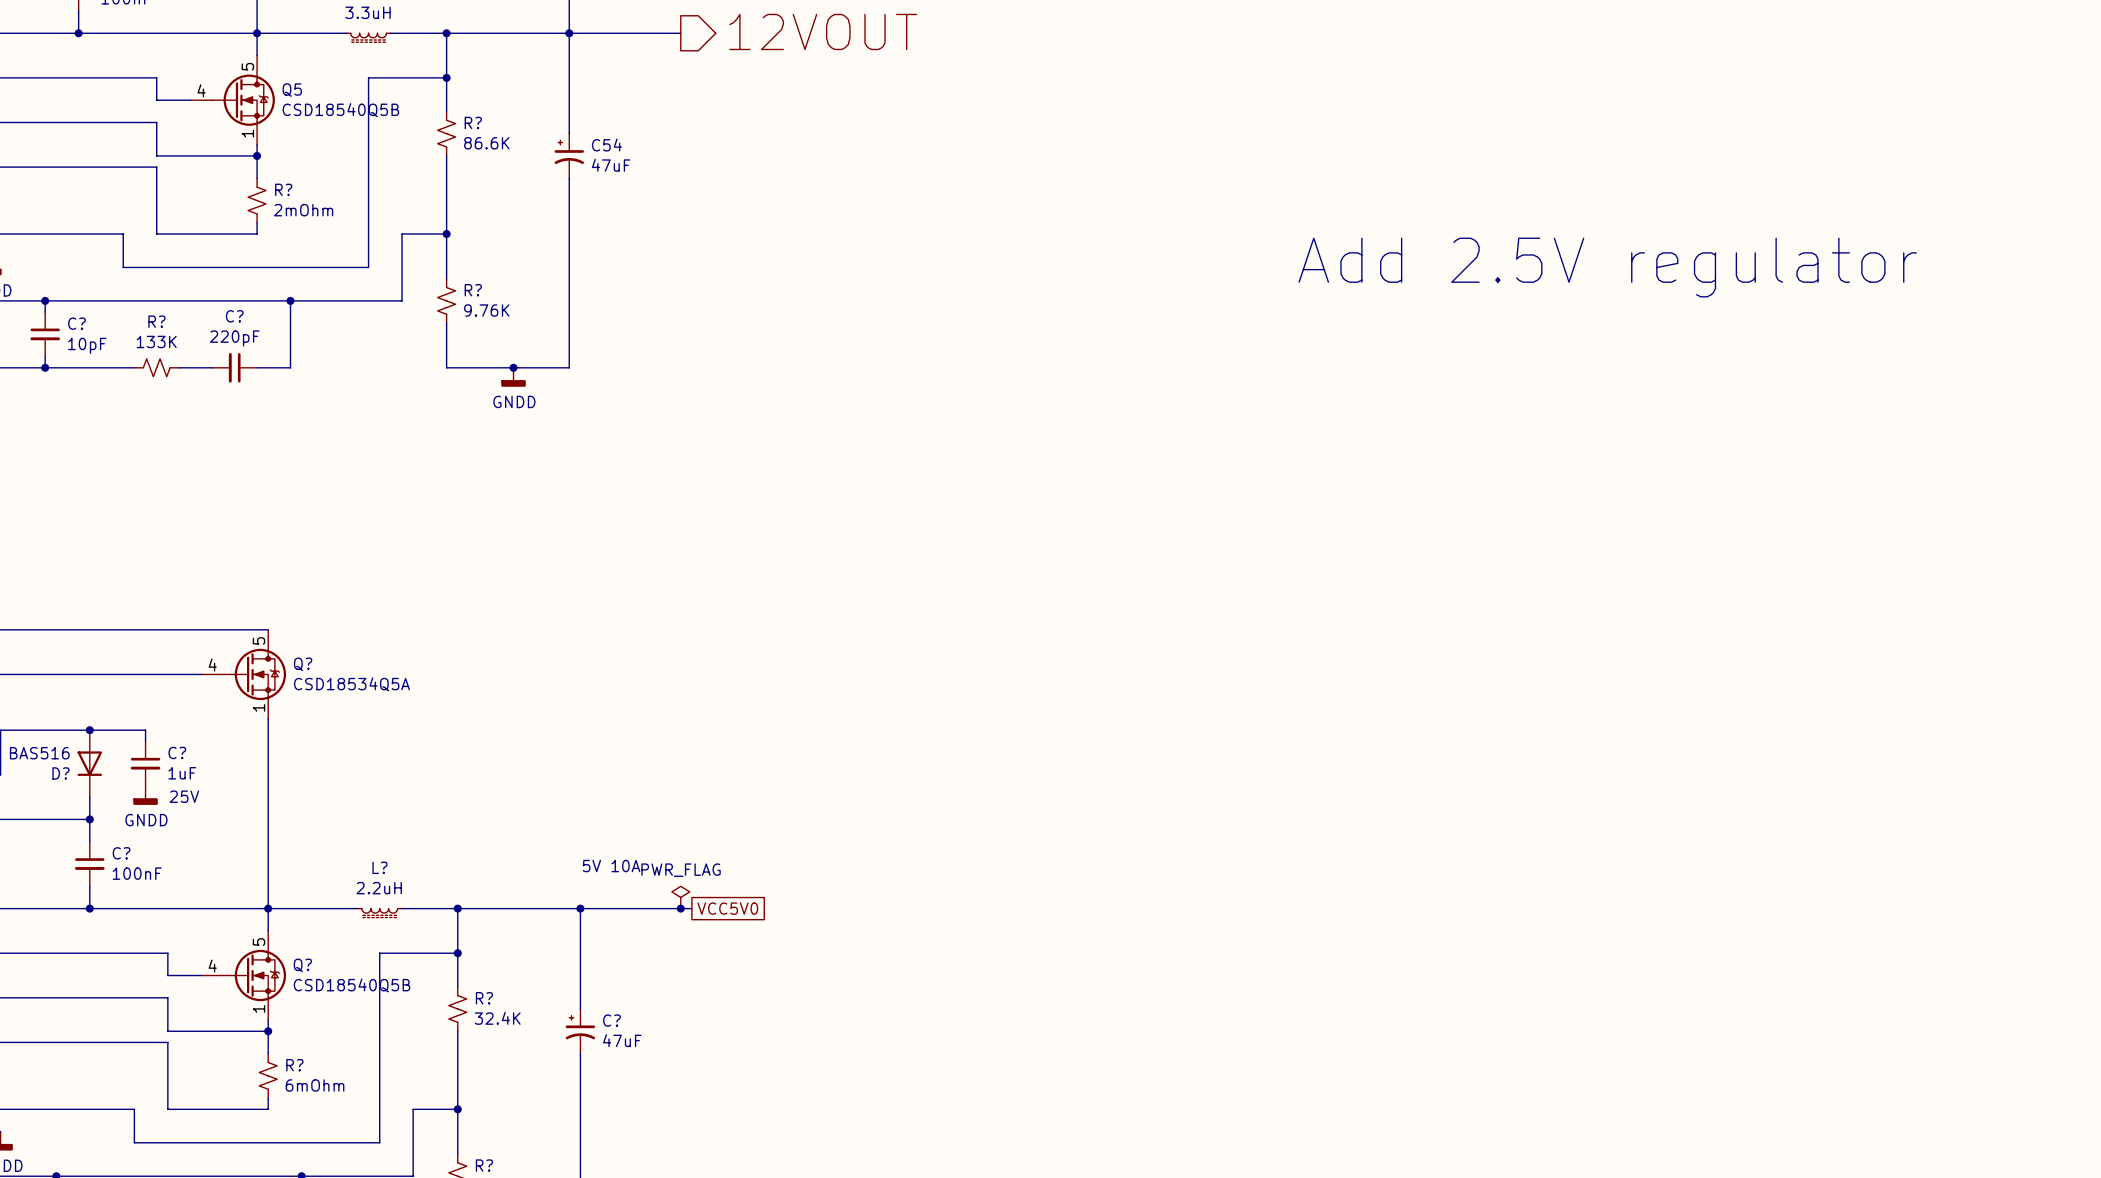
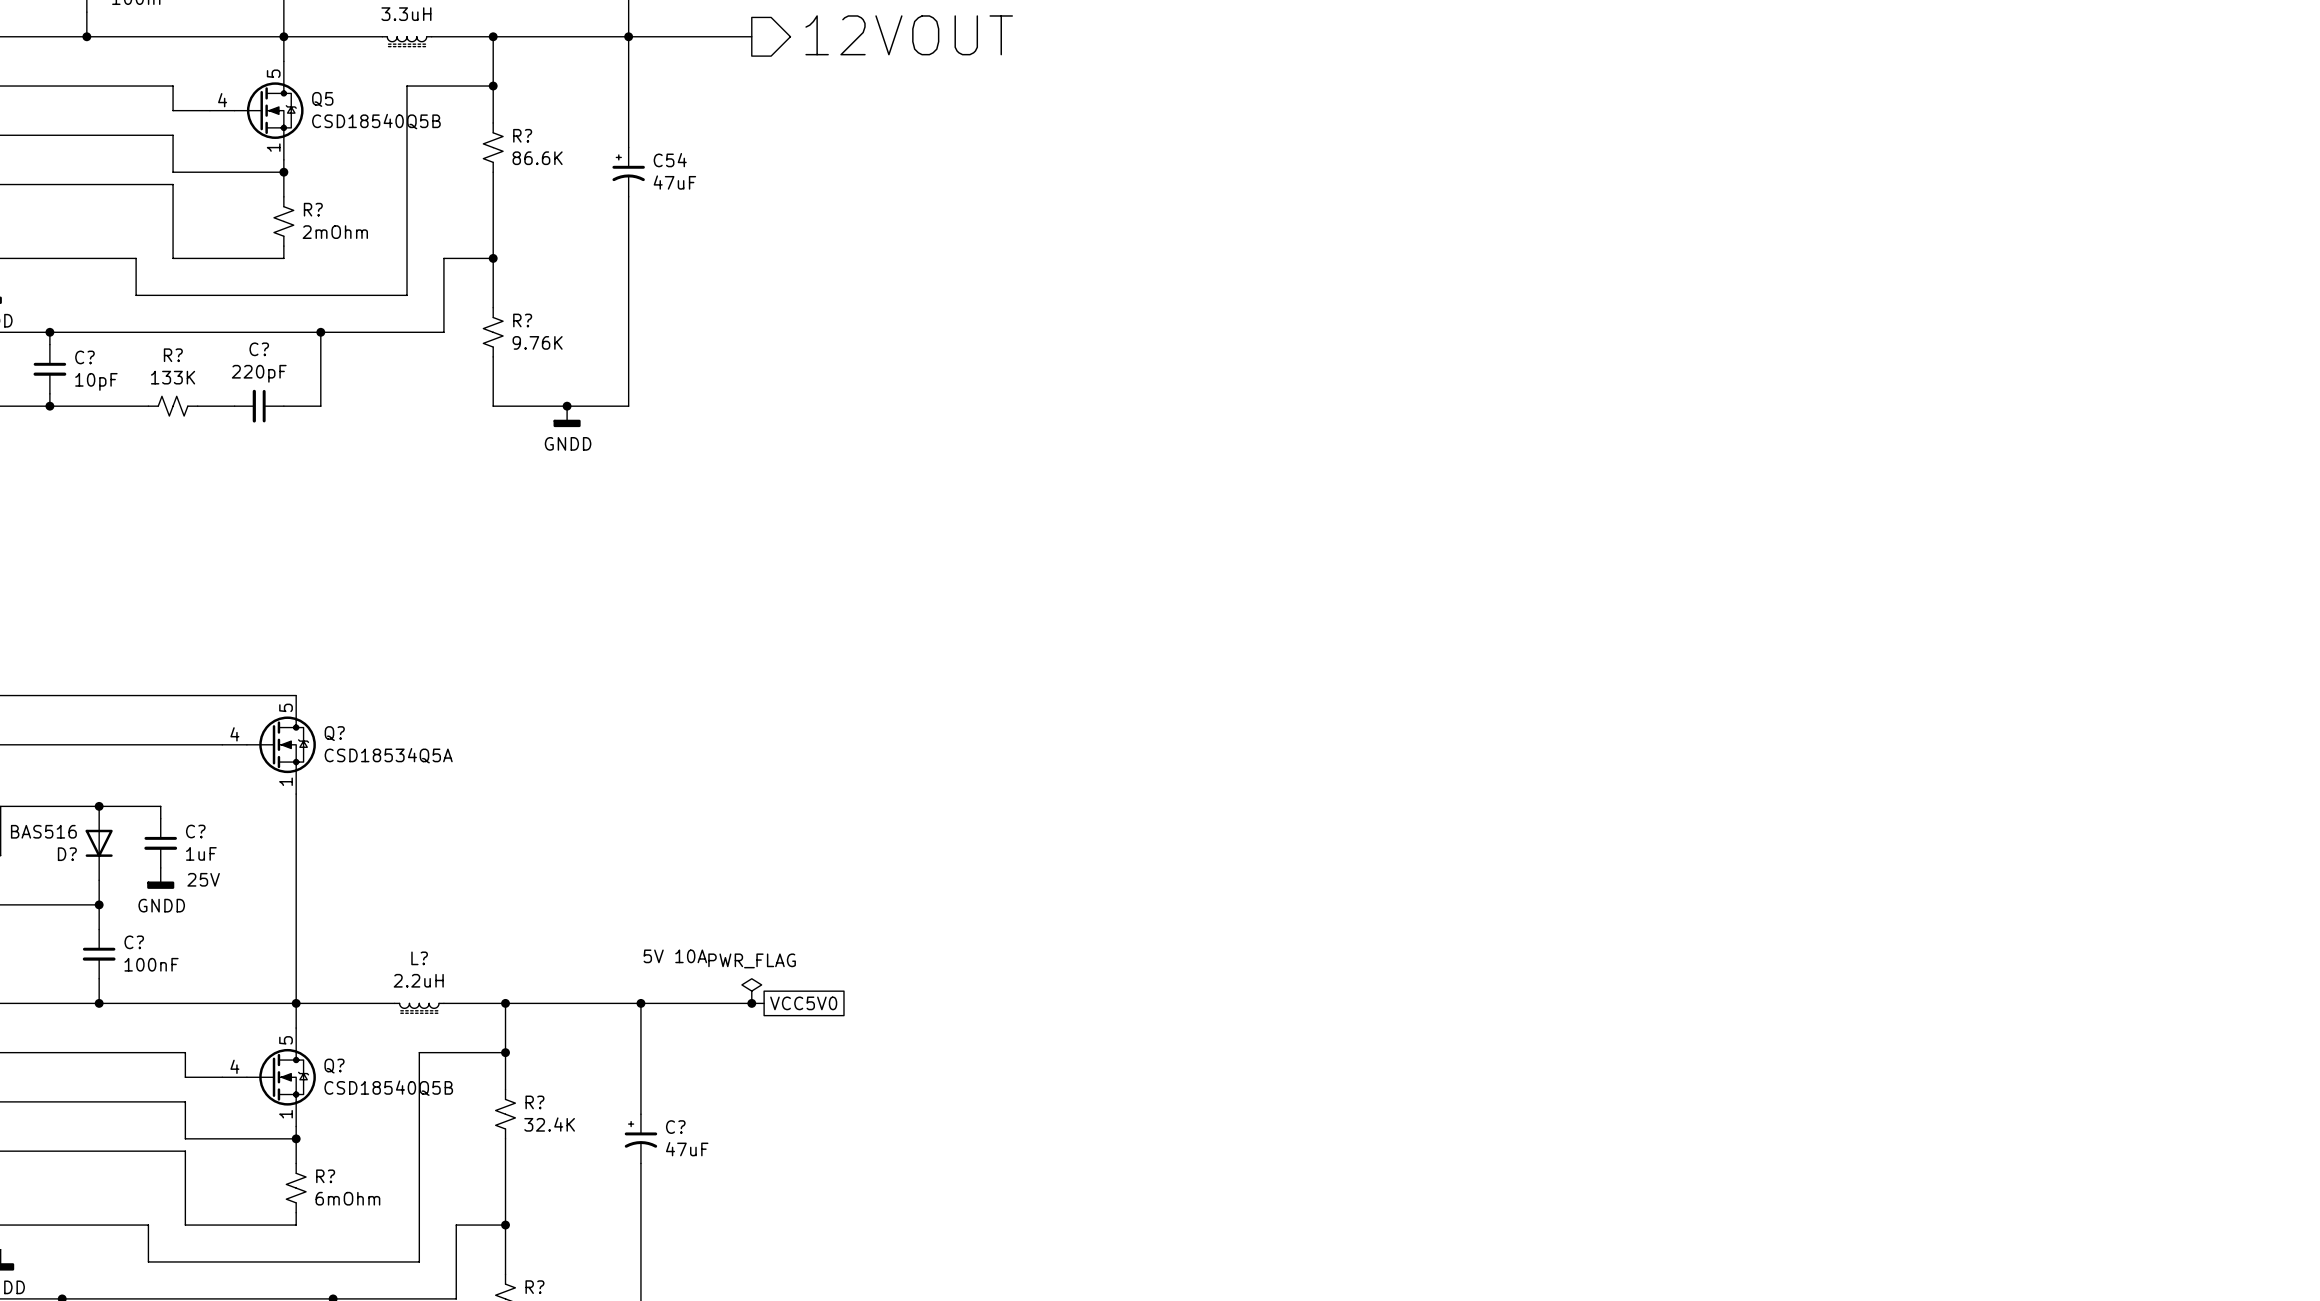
text: Add 2.5V regulator (1607, 267) -> none

